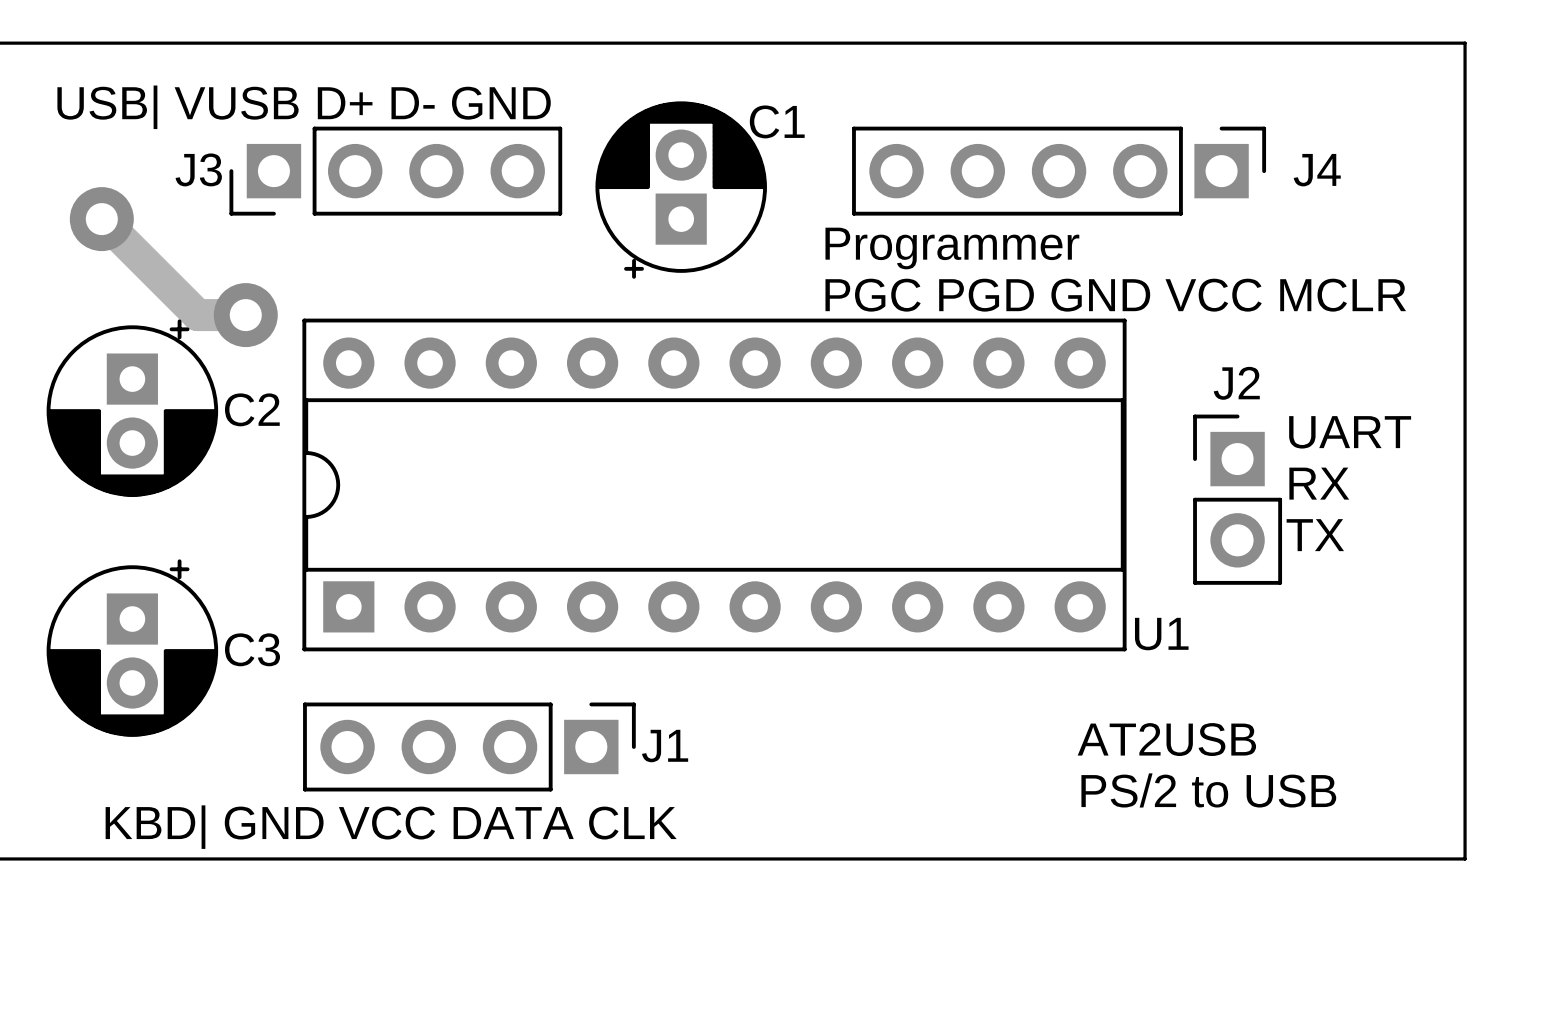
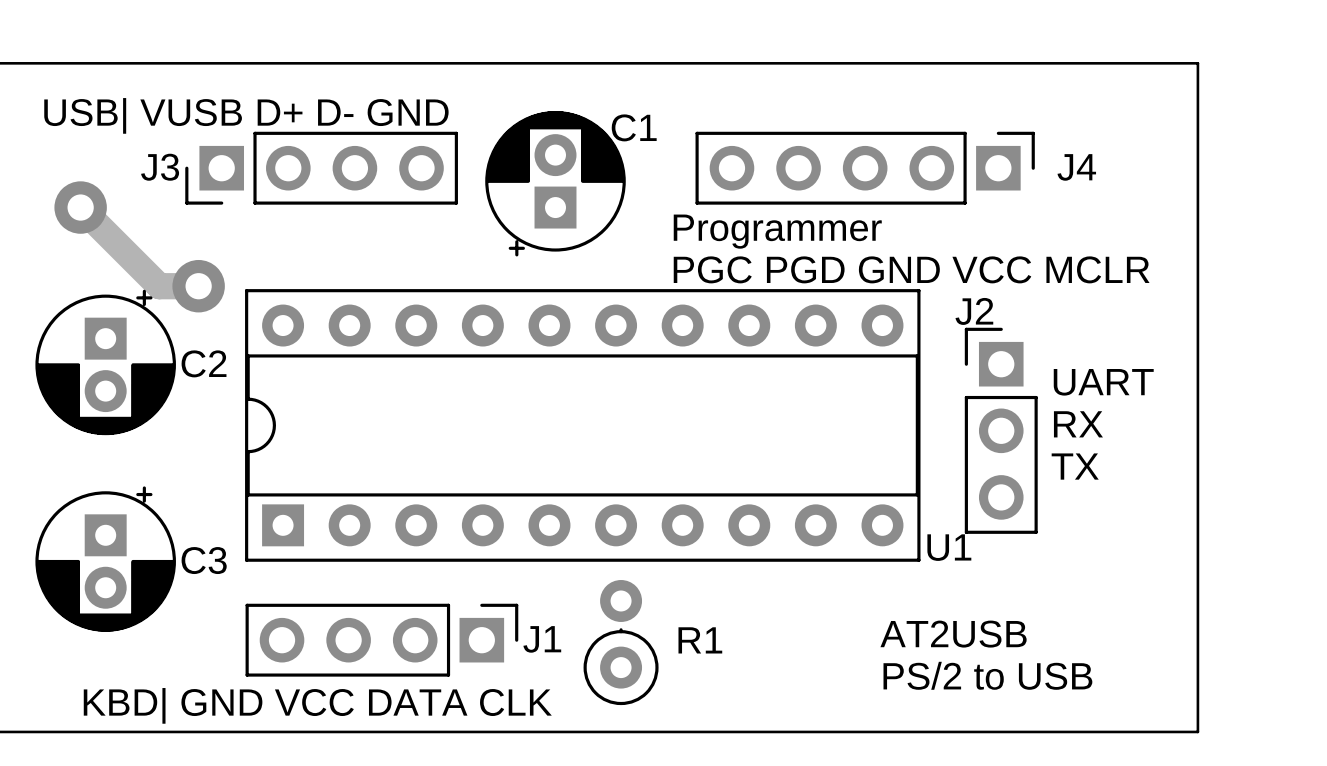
J2 footprint: [1193, 414, 1283, 585] -> [964, 327, 1038, 534]
R1: none -> (621, 642)

